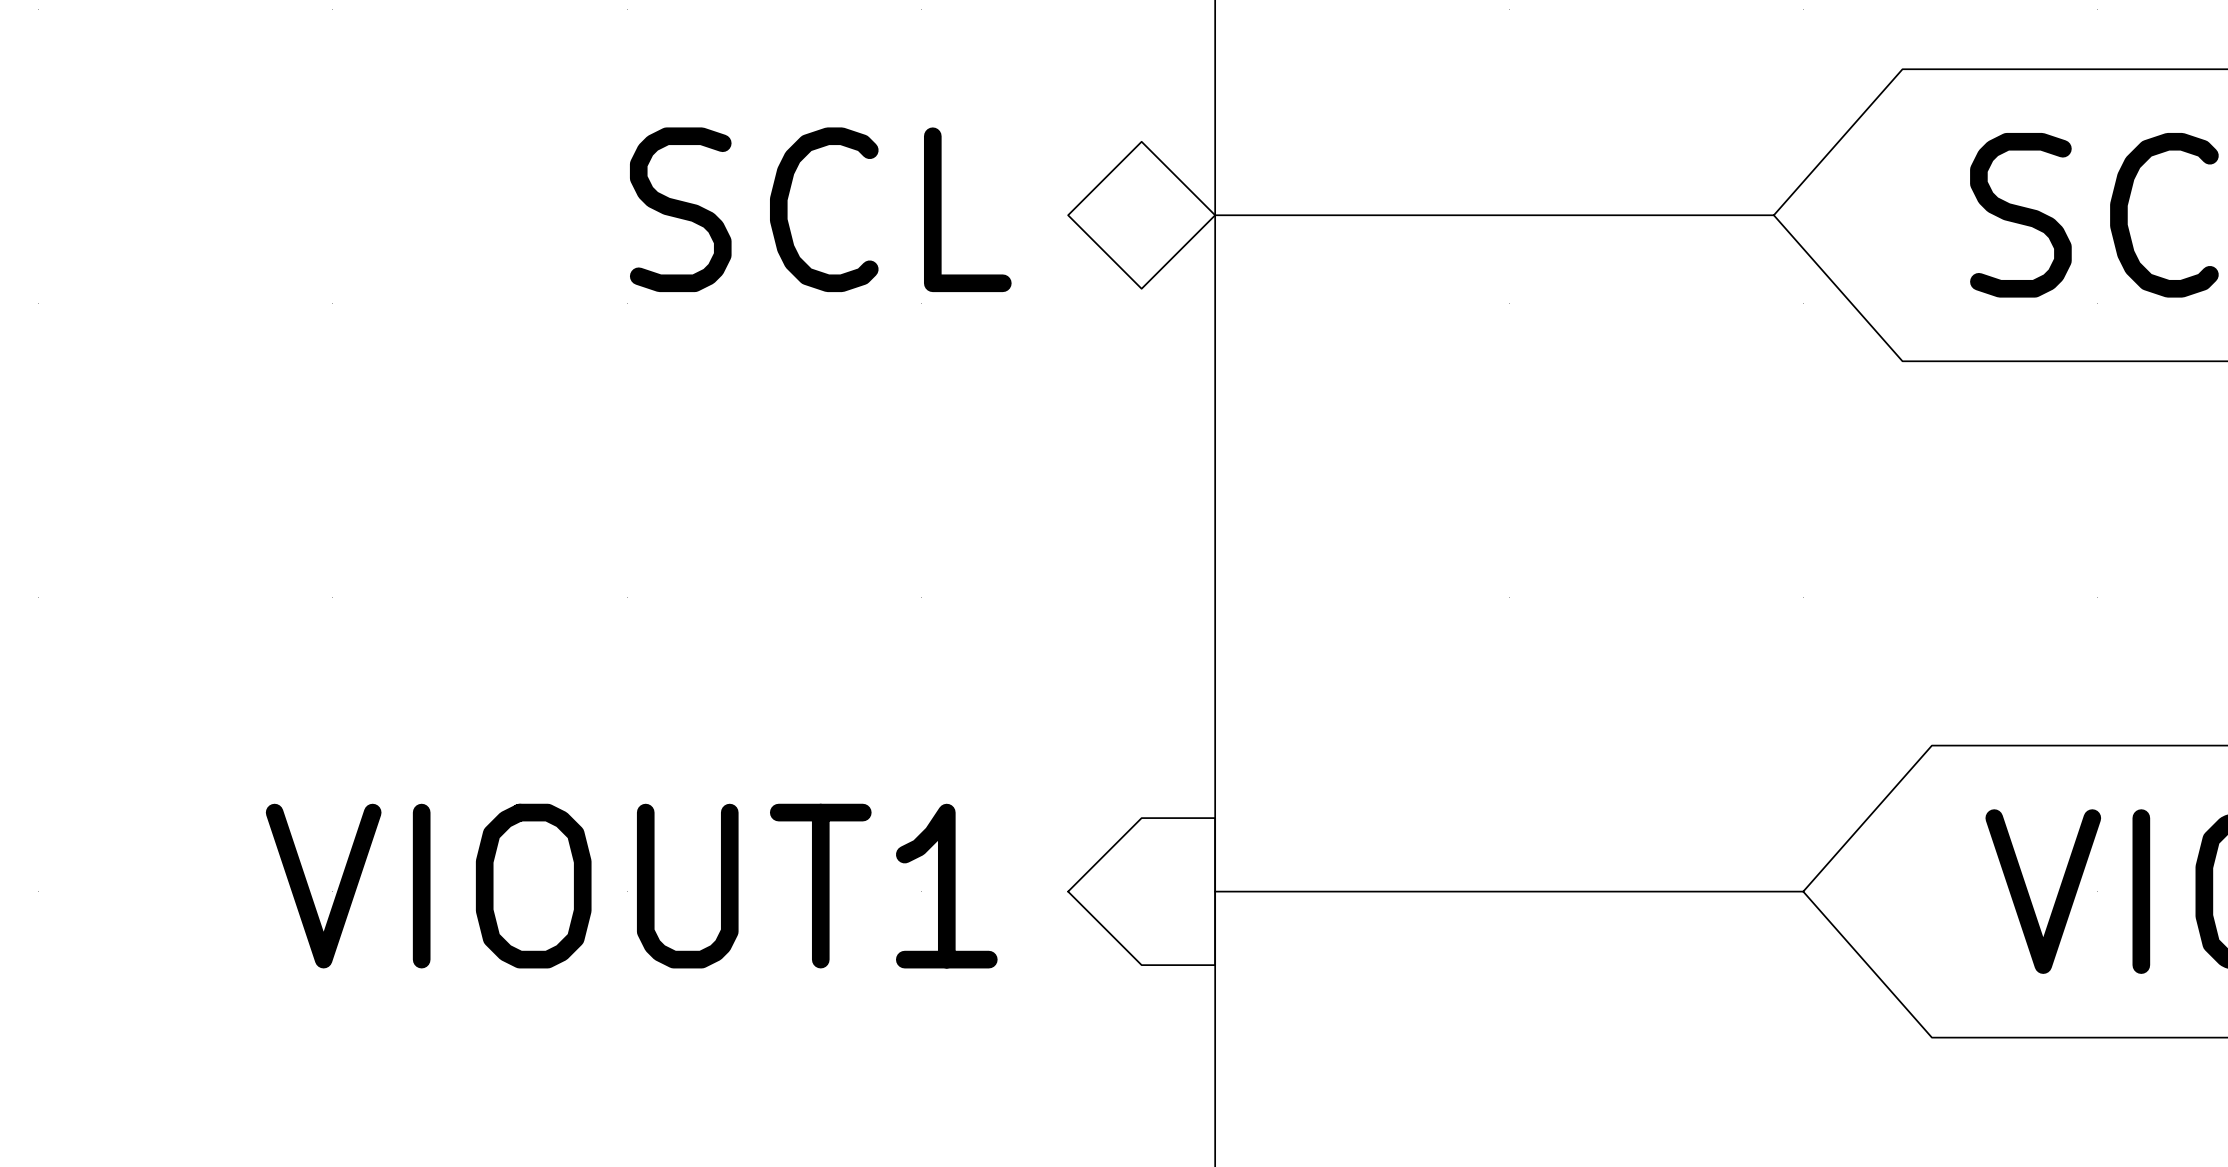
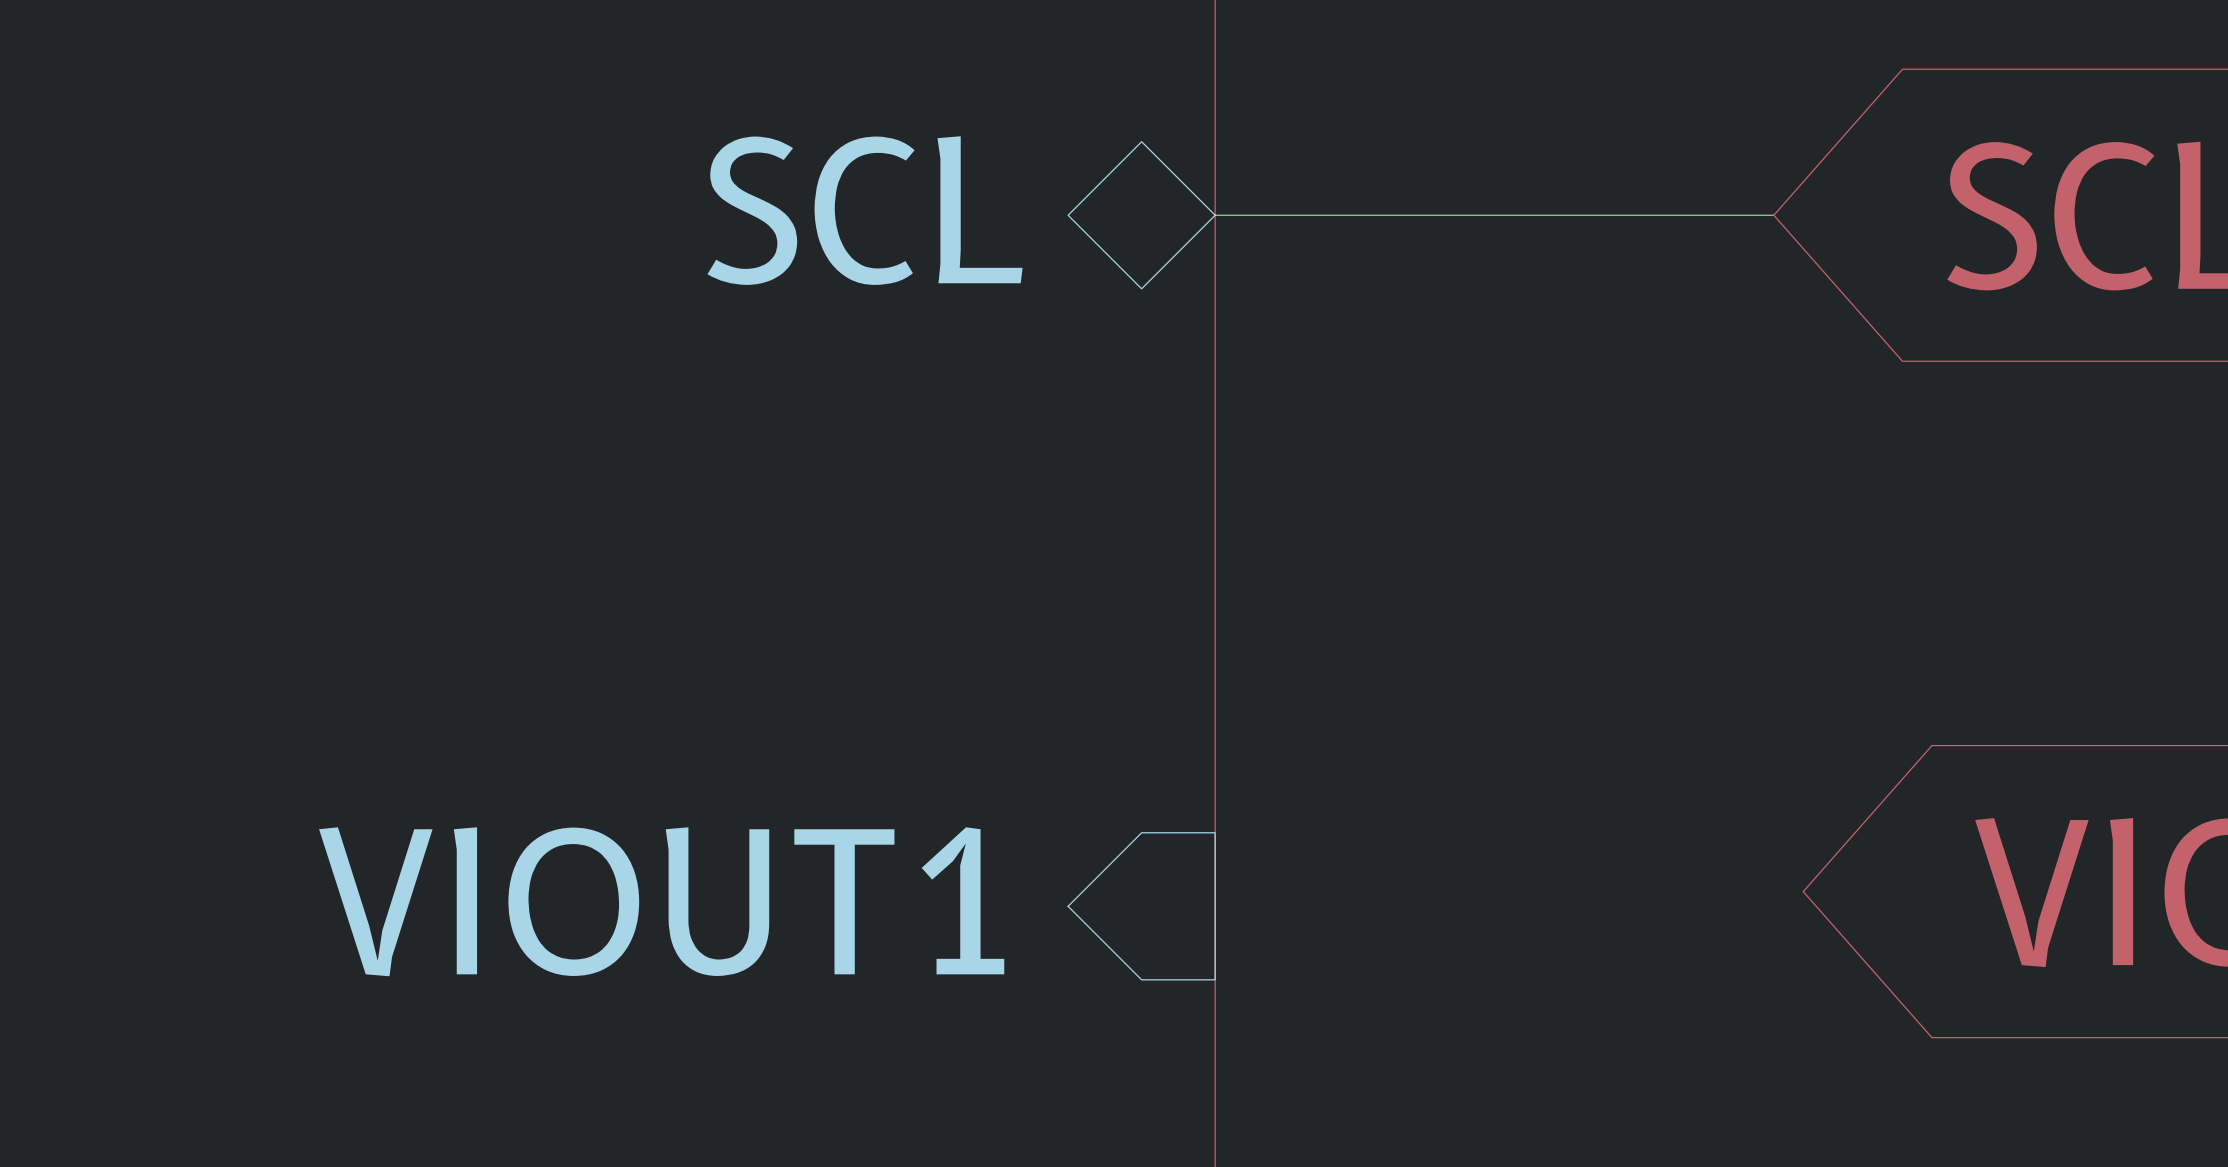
sheet pin position: VIOUT1 (631, 886) -> VIOUT1 (661, 901)
wire: (1215, 891) (1803, 891) -> none

